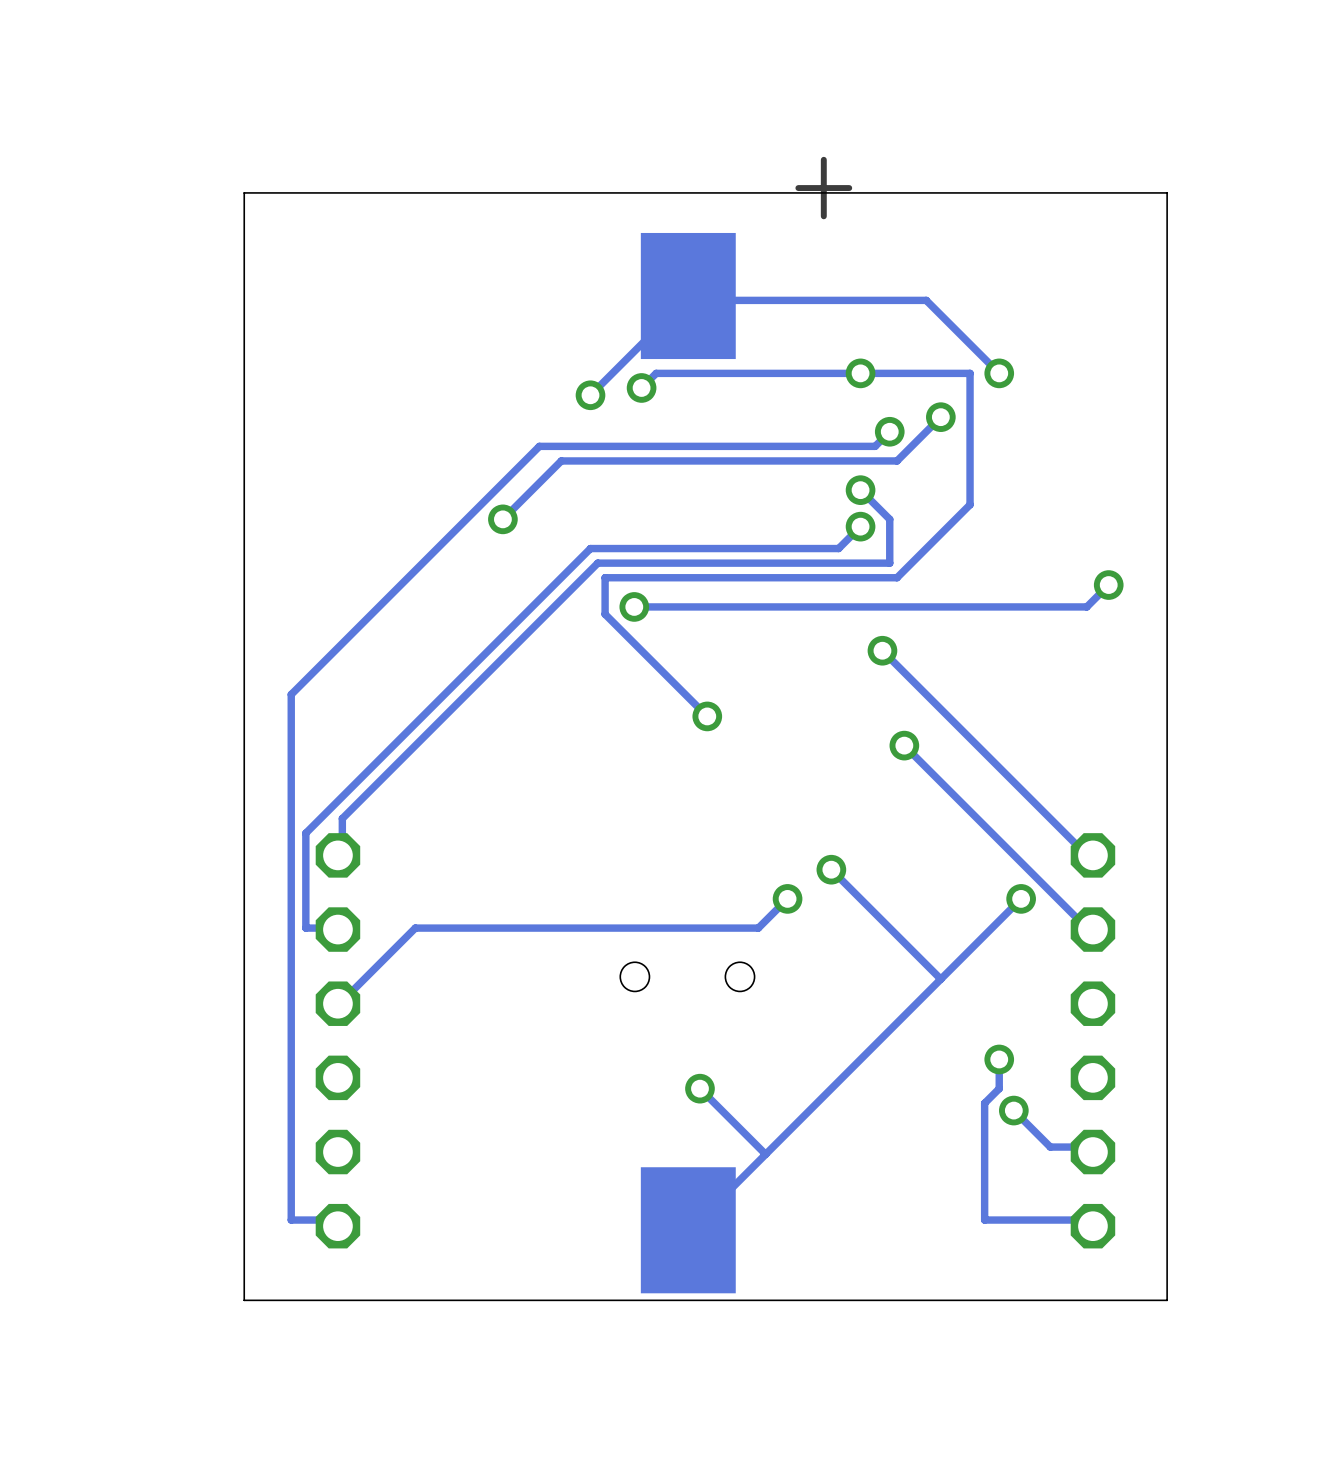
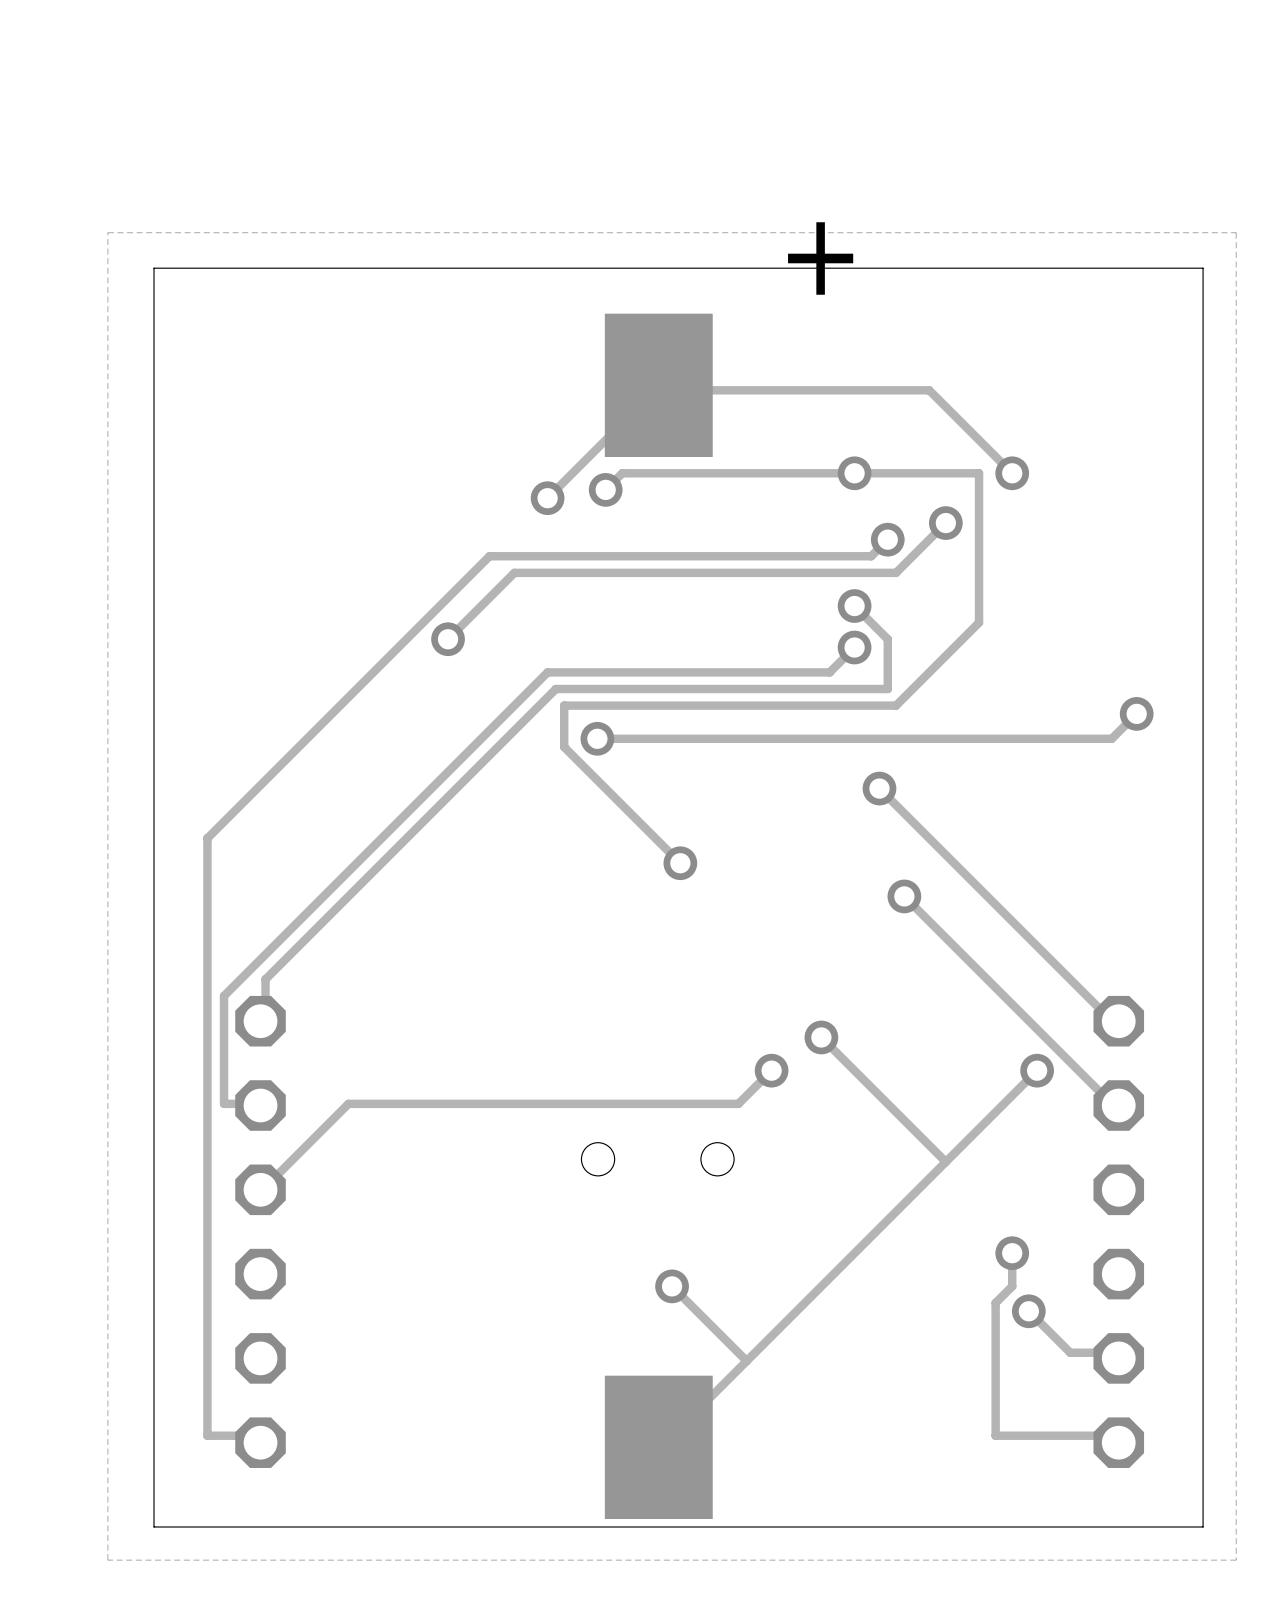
zone outline: none -> (1236, 232) (107, 232) (107, 1560) (1236, 1560) (1236, 232)

